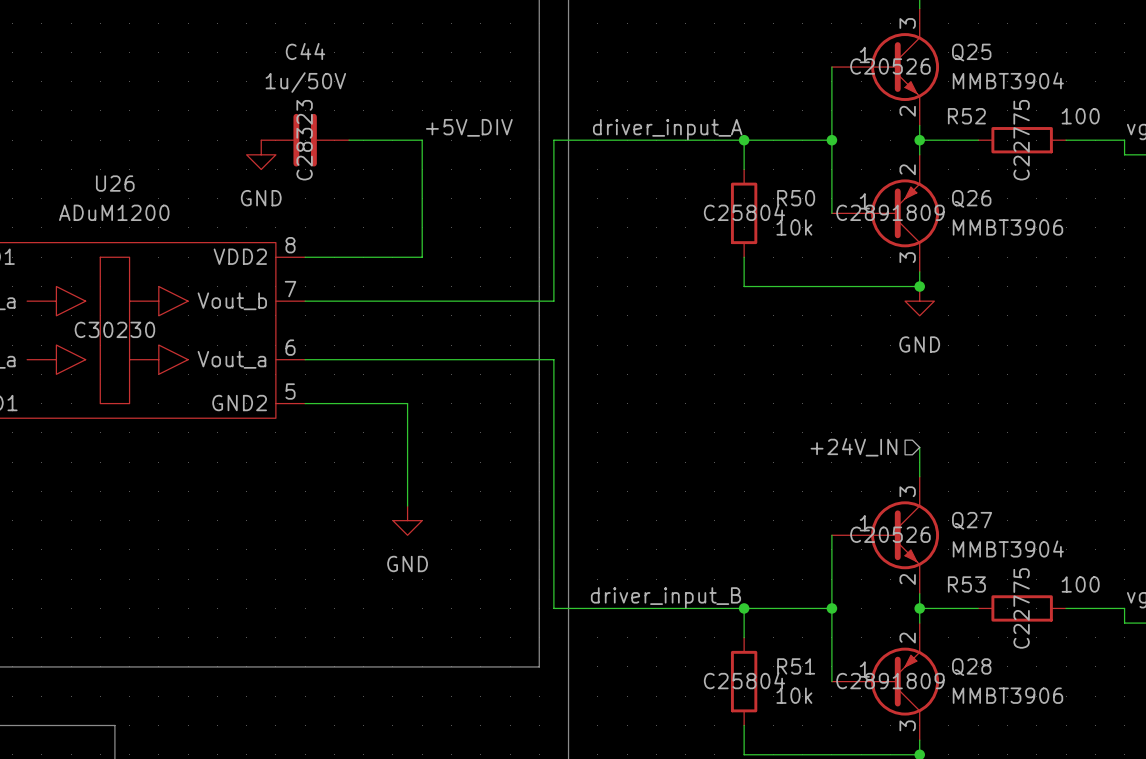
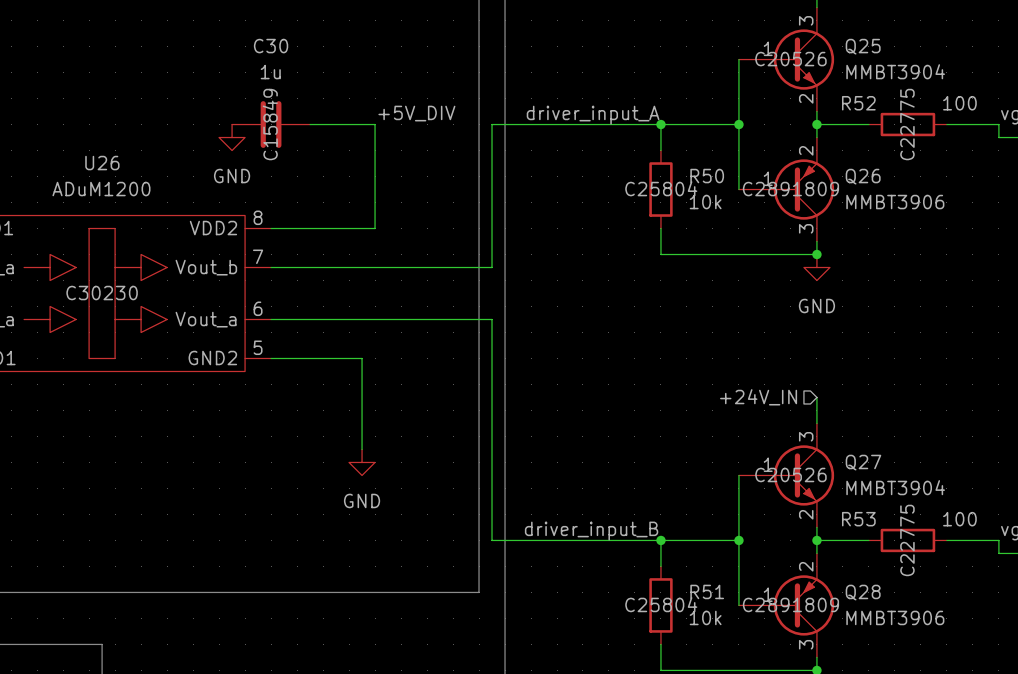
C44 name: C44 (305, 51) -> C30 (271, 46)
C44 value: 1u/50V (305, 82) -> 1u (270, 72)
C44 text: C28323 (304, 140) -> C15849 (270, 124)

